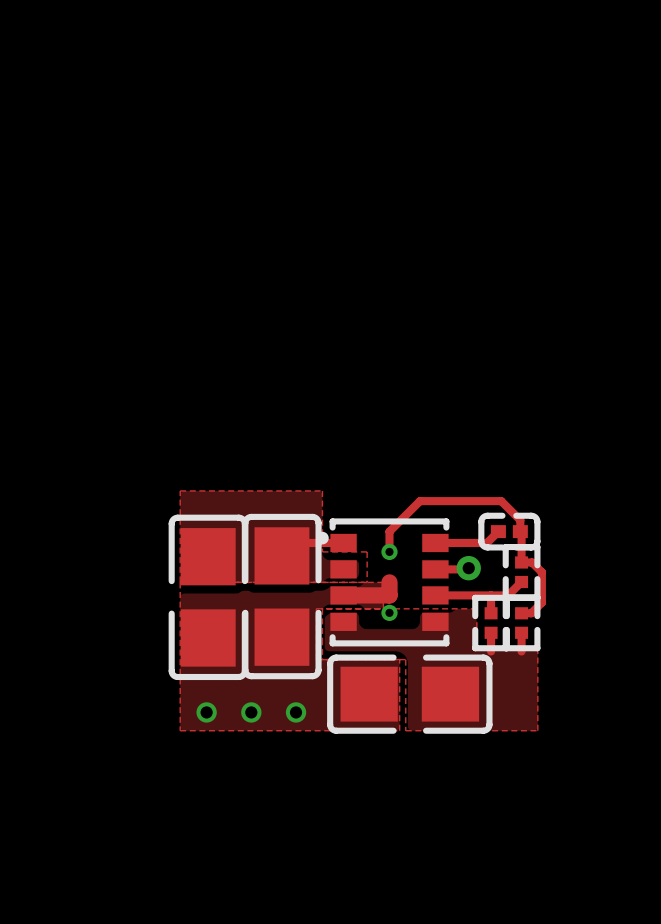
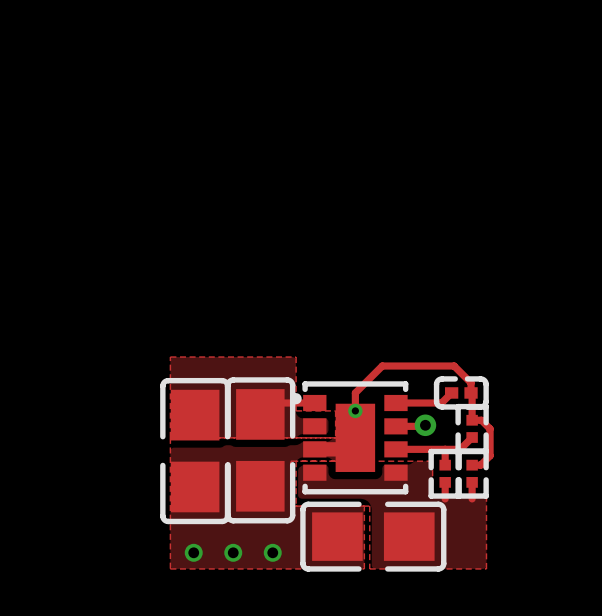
part footprint: [316, 518, 450, 647] -> [290, 381, 409, 495]

